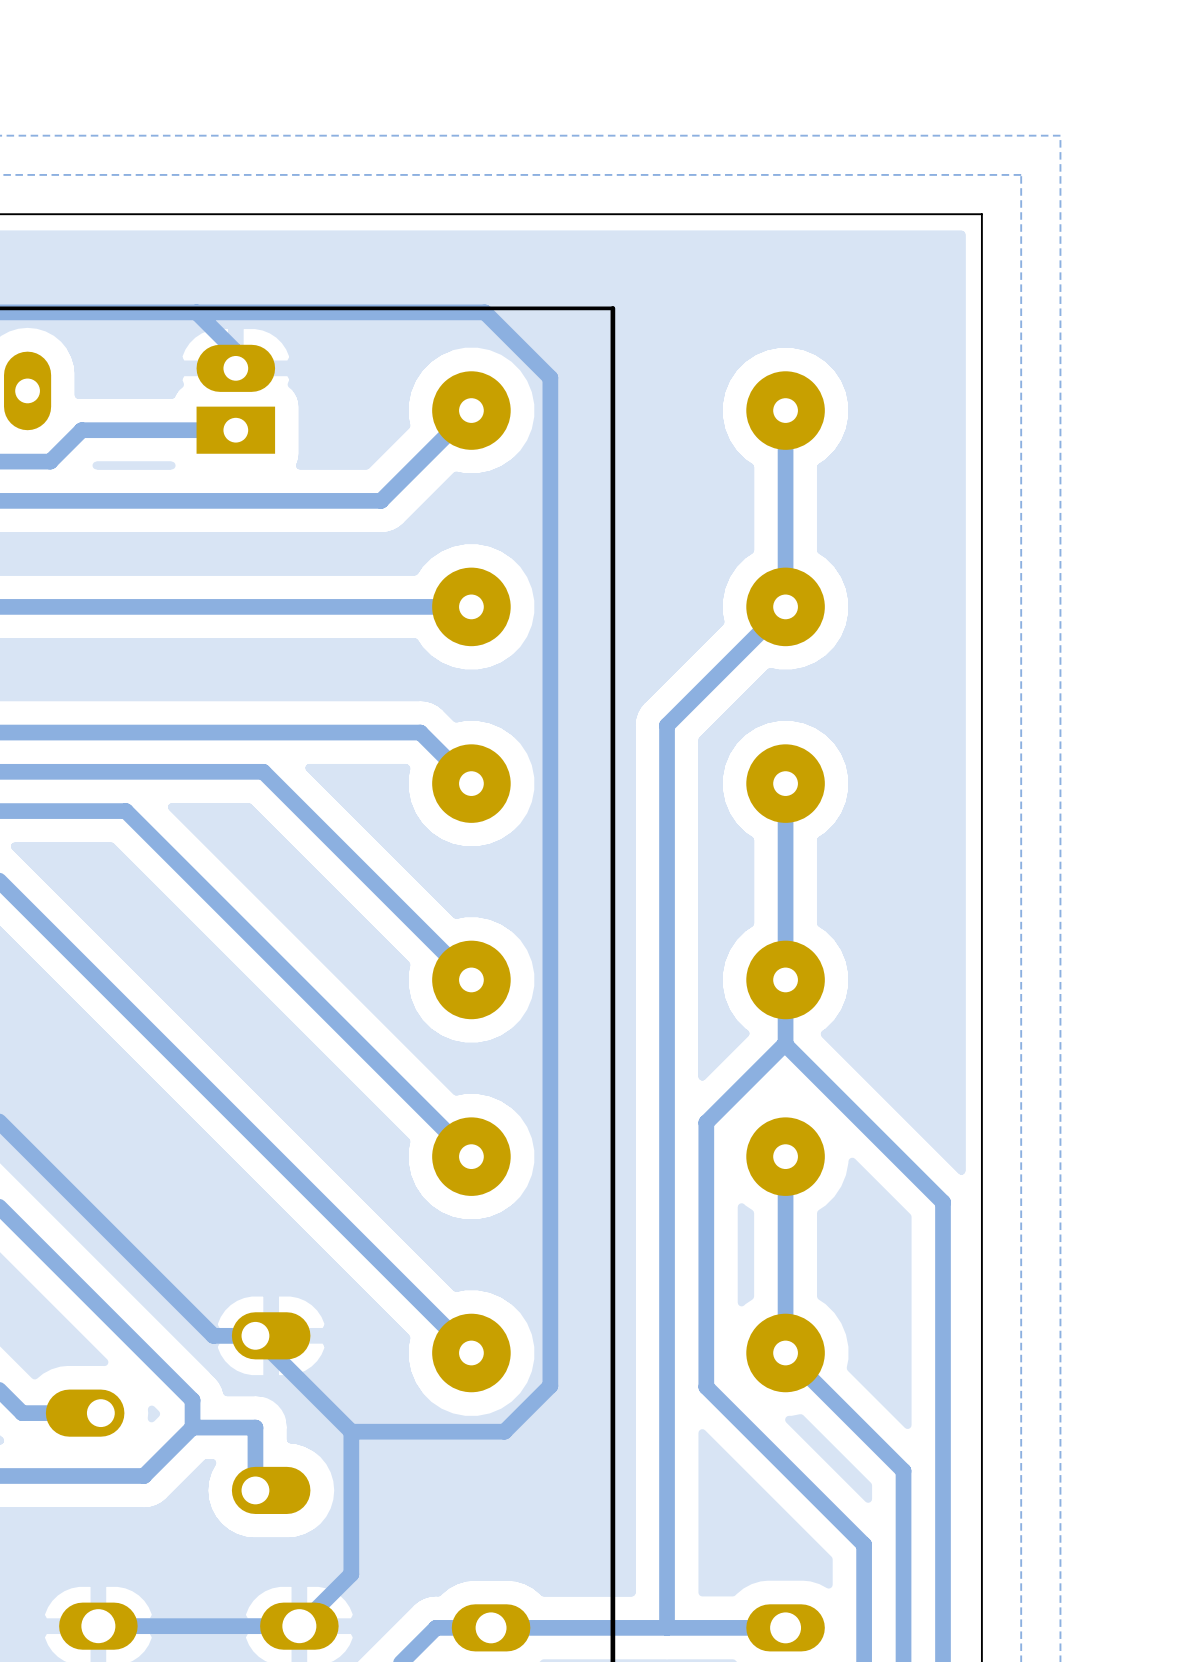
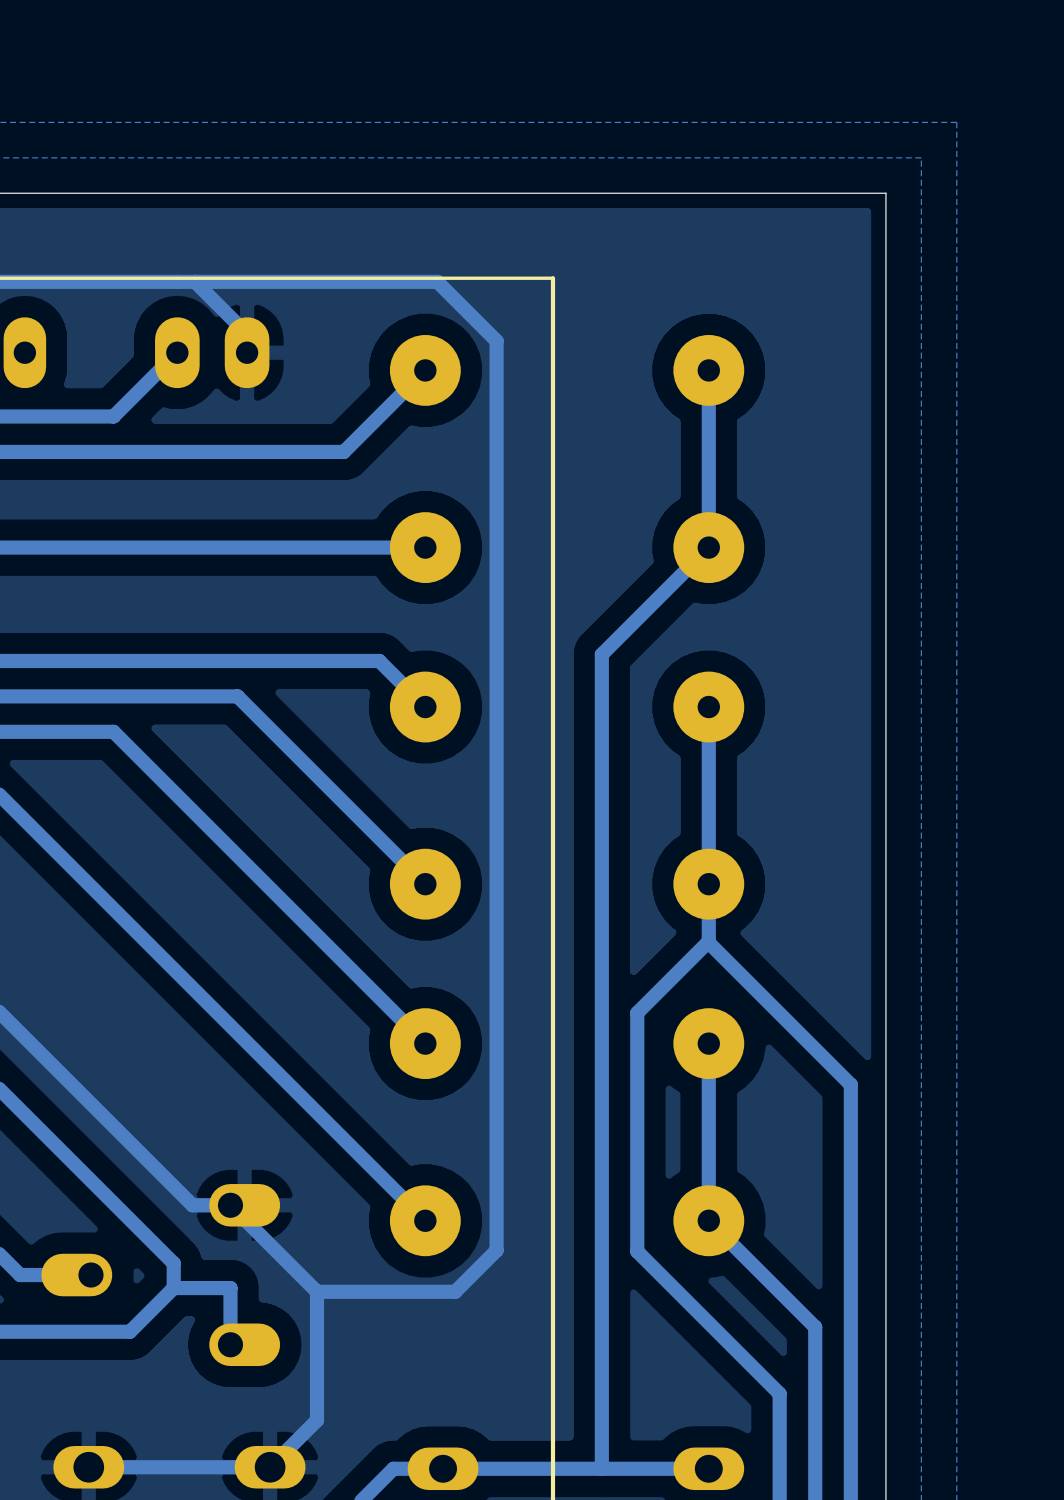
bottom track: (196, 312) (235, 351) (235, 368) -> none
bottom track: none -> (195, 281) (247, 333) (247, 352)
part footprint: [196, 344, 276, 454] -> [155, 317, 270, 389]
bottom track: (235, 430) (81, 430) (50, 461) -> (177, 352) (113, 416) (45, 416)

